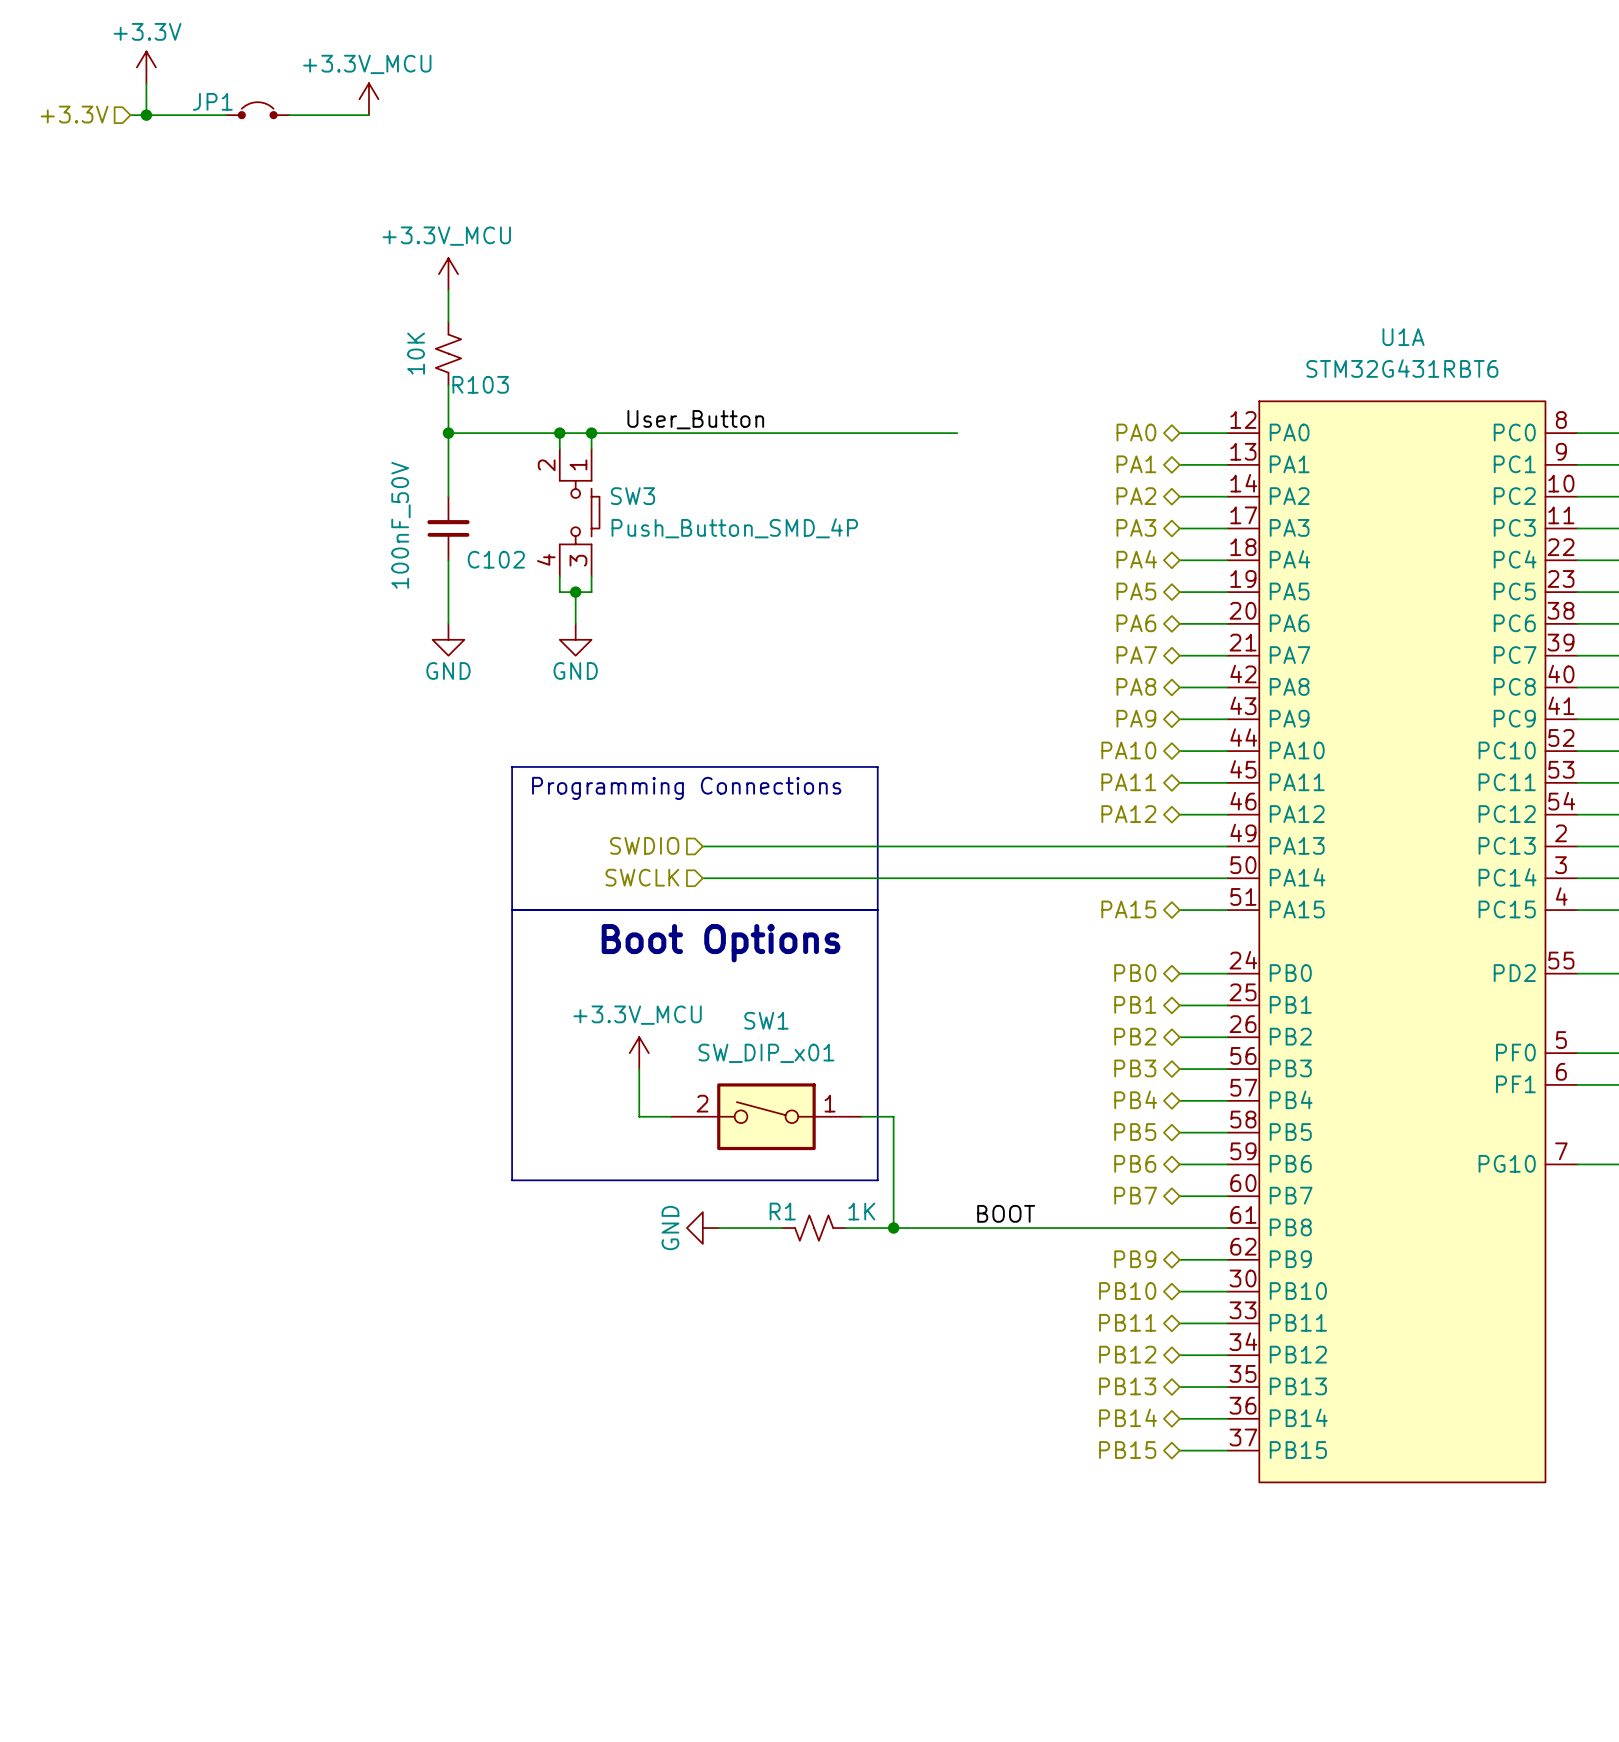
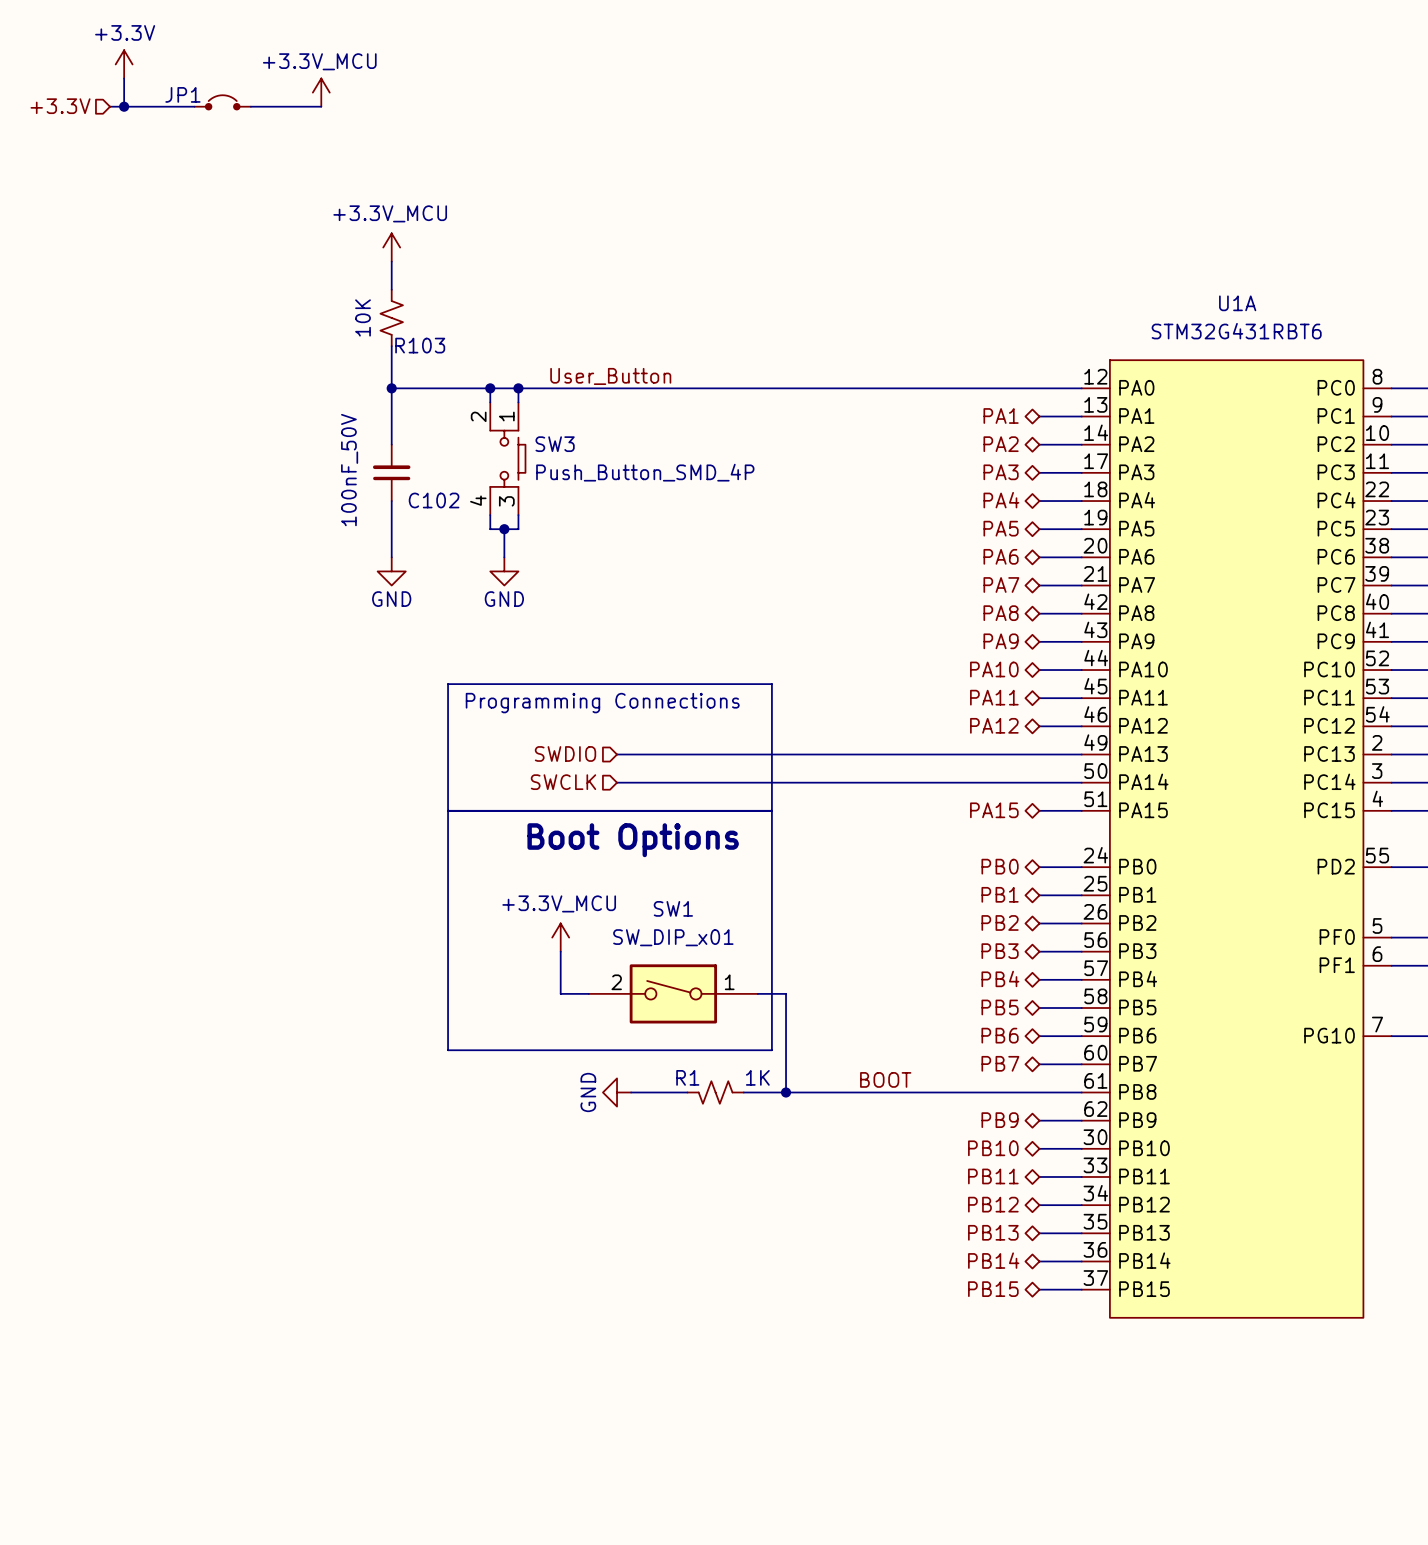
hierarchical label: PA0 (1136, 432) -> none
wire: none -> (842, 388) (1039, 388)

